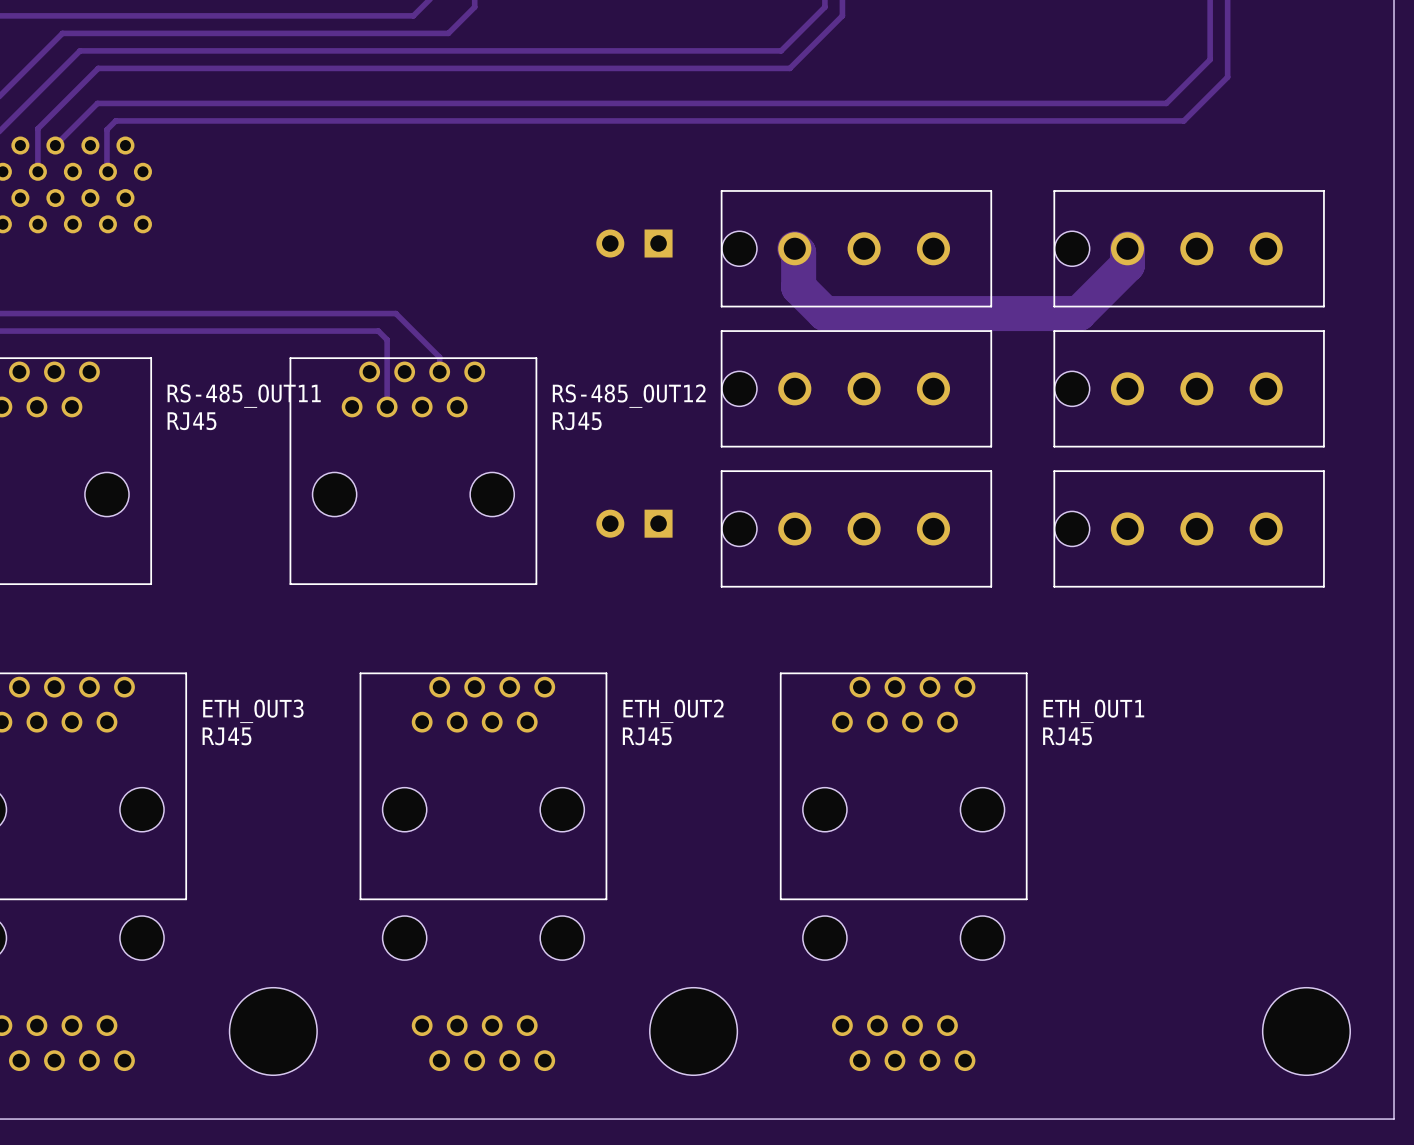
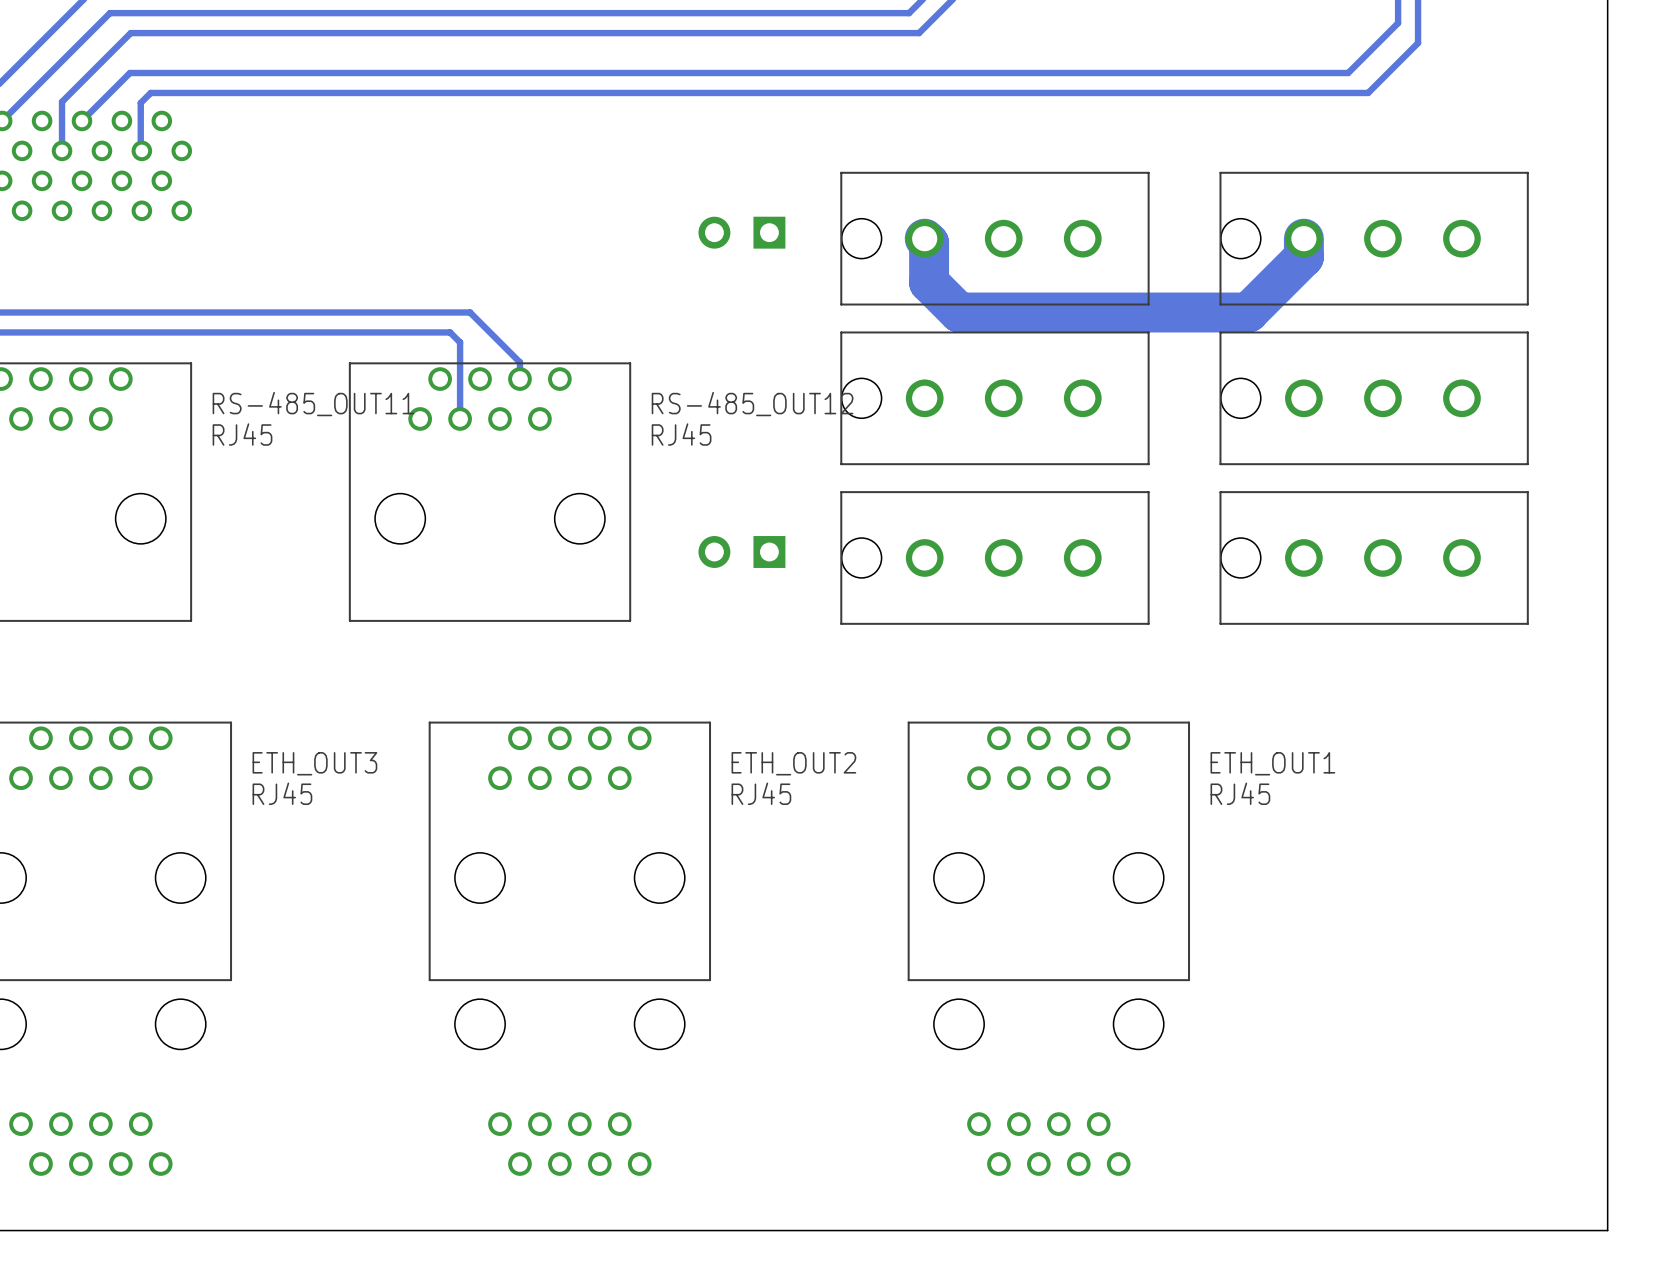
hole: (273, 1031) -> none
hole: (693, 1031) -> none
hole: (1306, 1031) -> none

